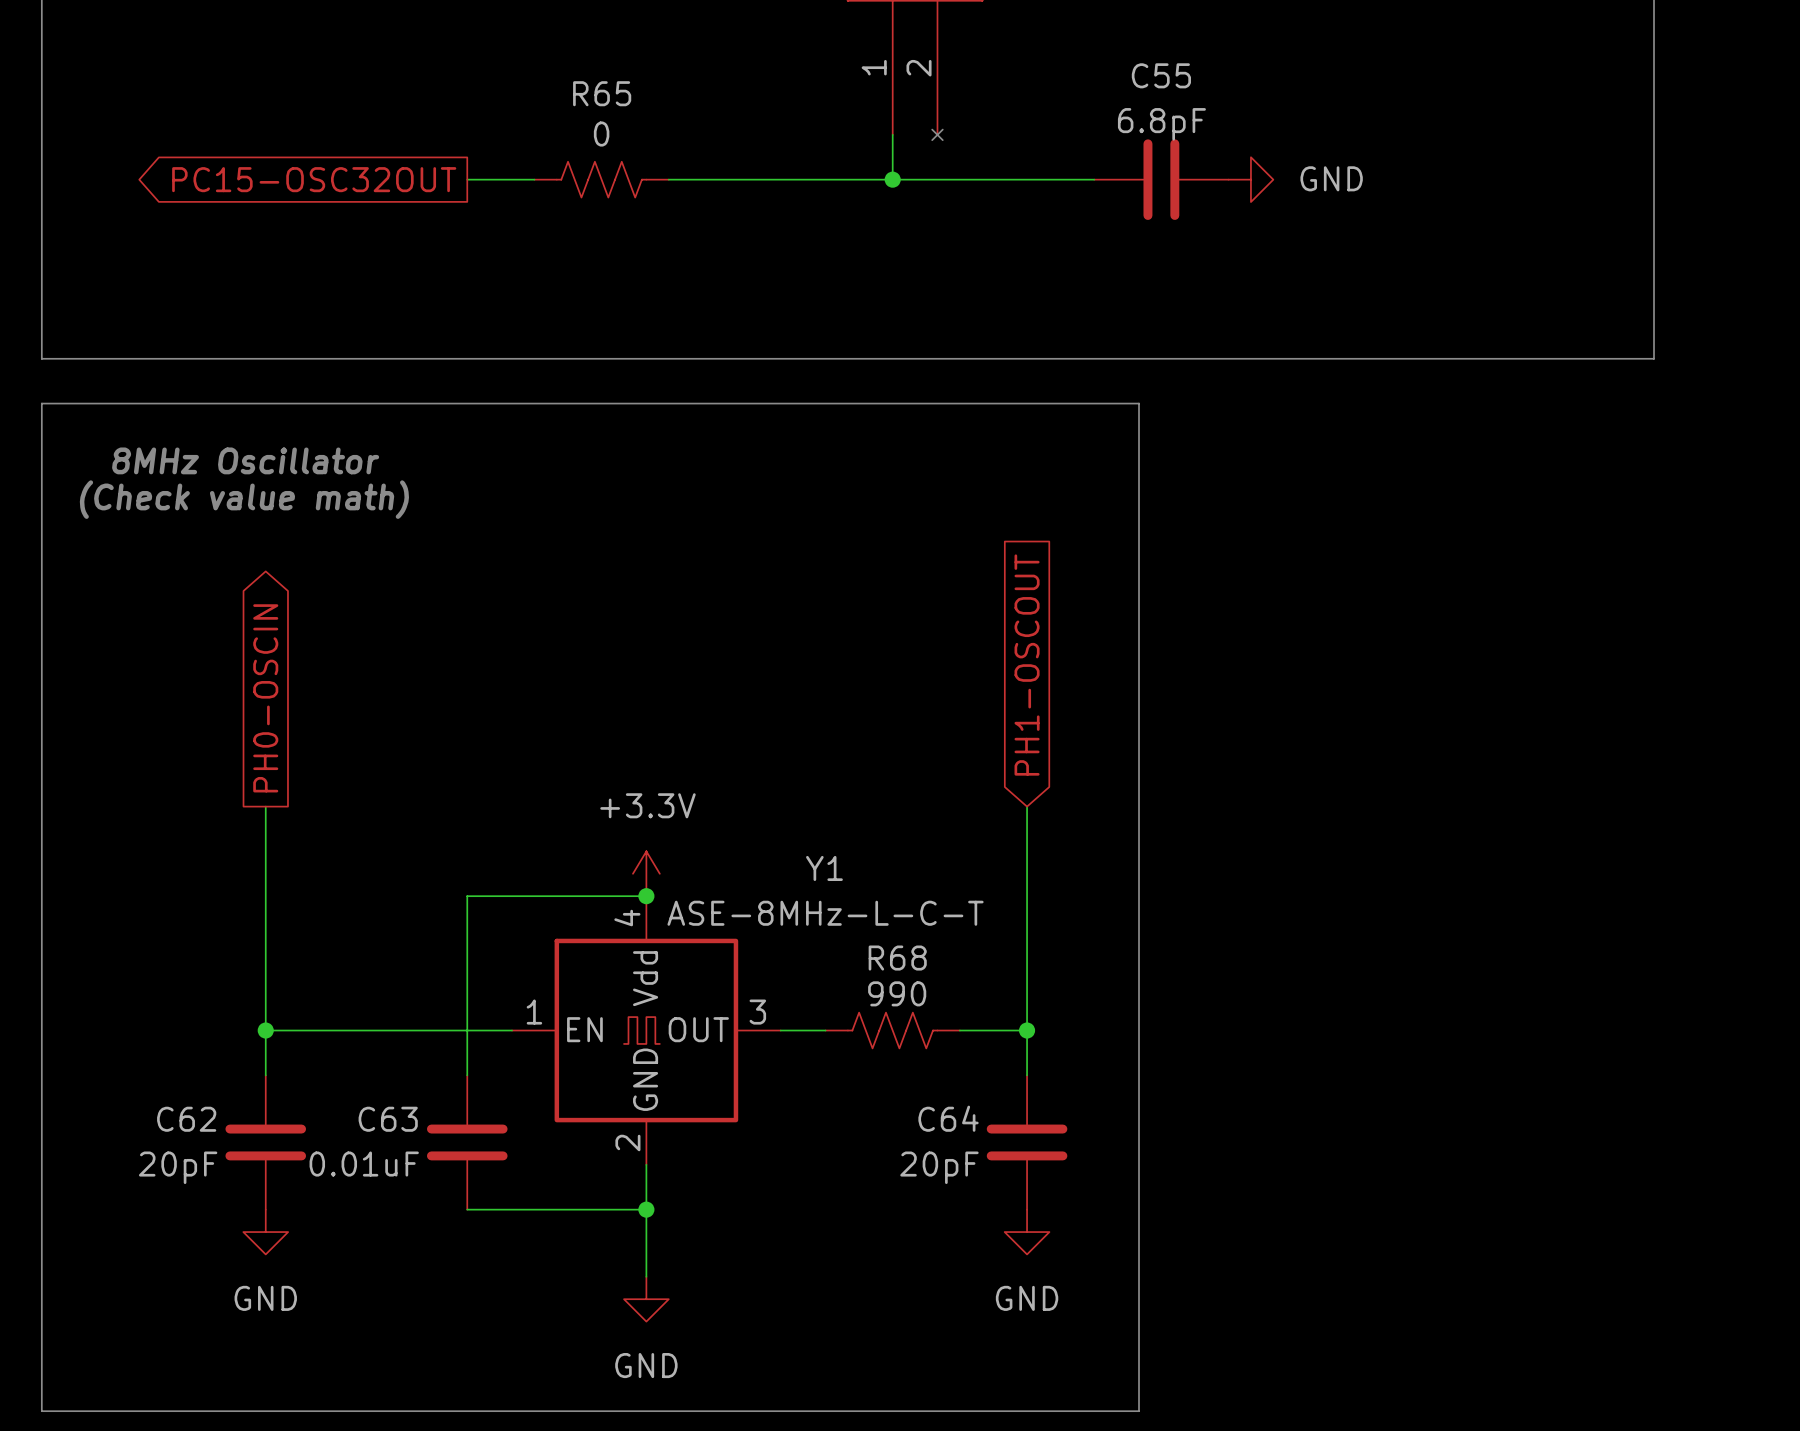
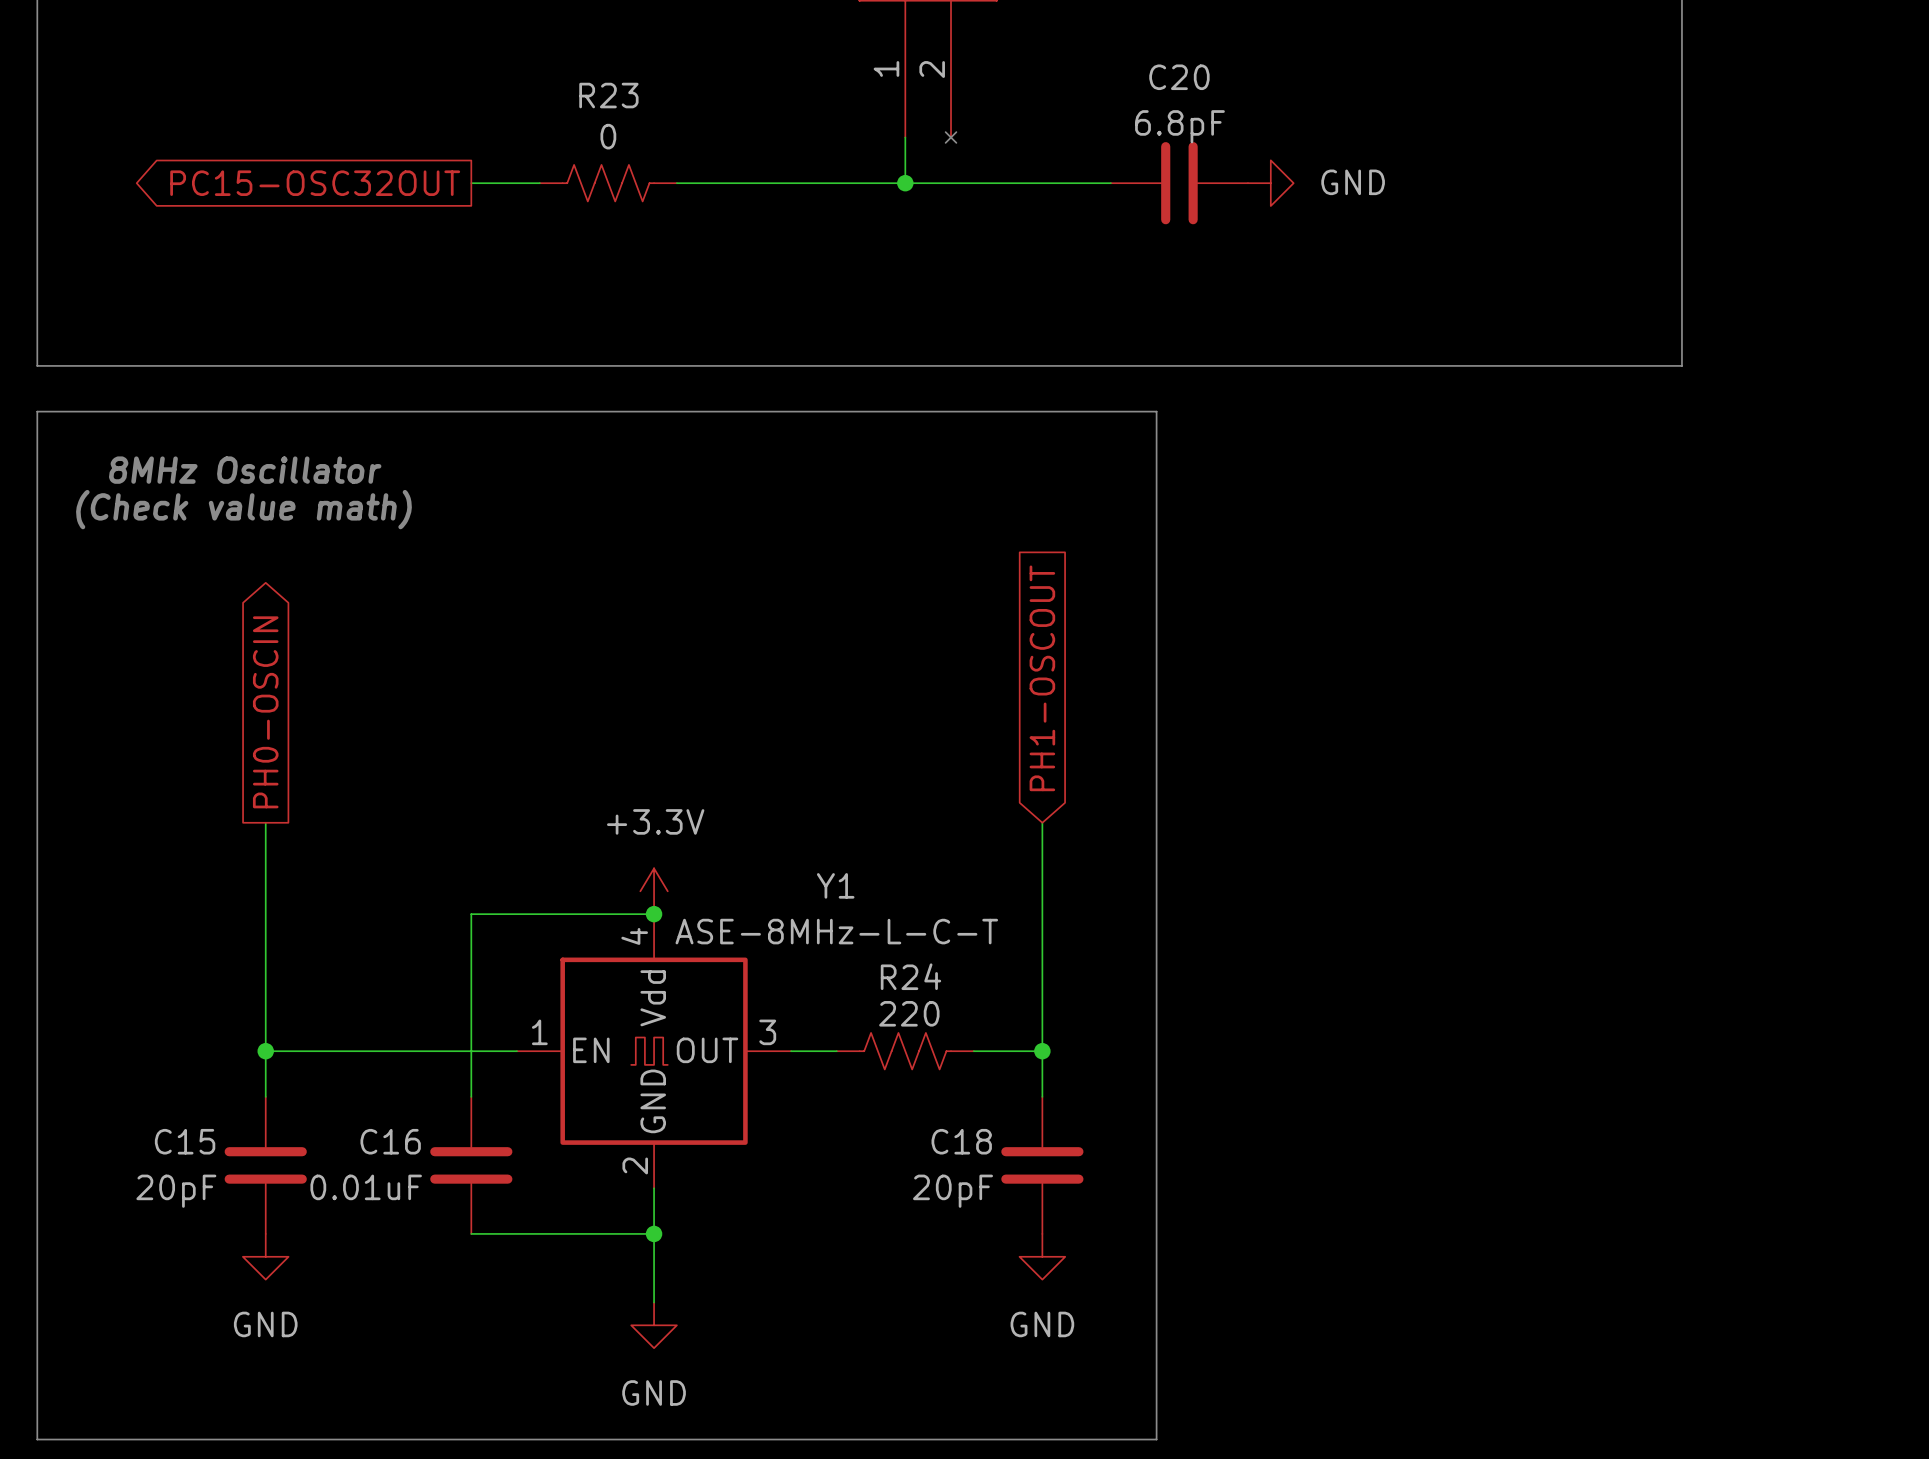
C55 name: C55 (1161, 75) -> C20 (1179, 77)
R65 name: R65 (602, 93) -> R23 (608, 95)
R68 name: R68 (897, 958) -> R24 (910, 976)
R68 value: 990 (897, 993) -> 220 (909, 1013)
C64 name: C64 (948, 1118) -> C18 (961, 1141)
C62 name: C62 (186, 1119) -> C15 (185, 1141)
C63 name: C63 (388, 1119) -> C16 (390, 1141)

